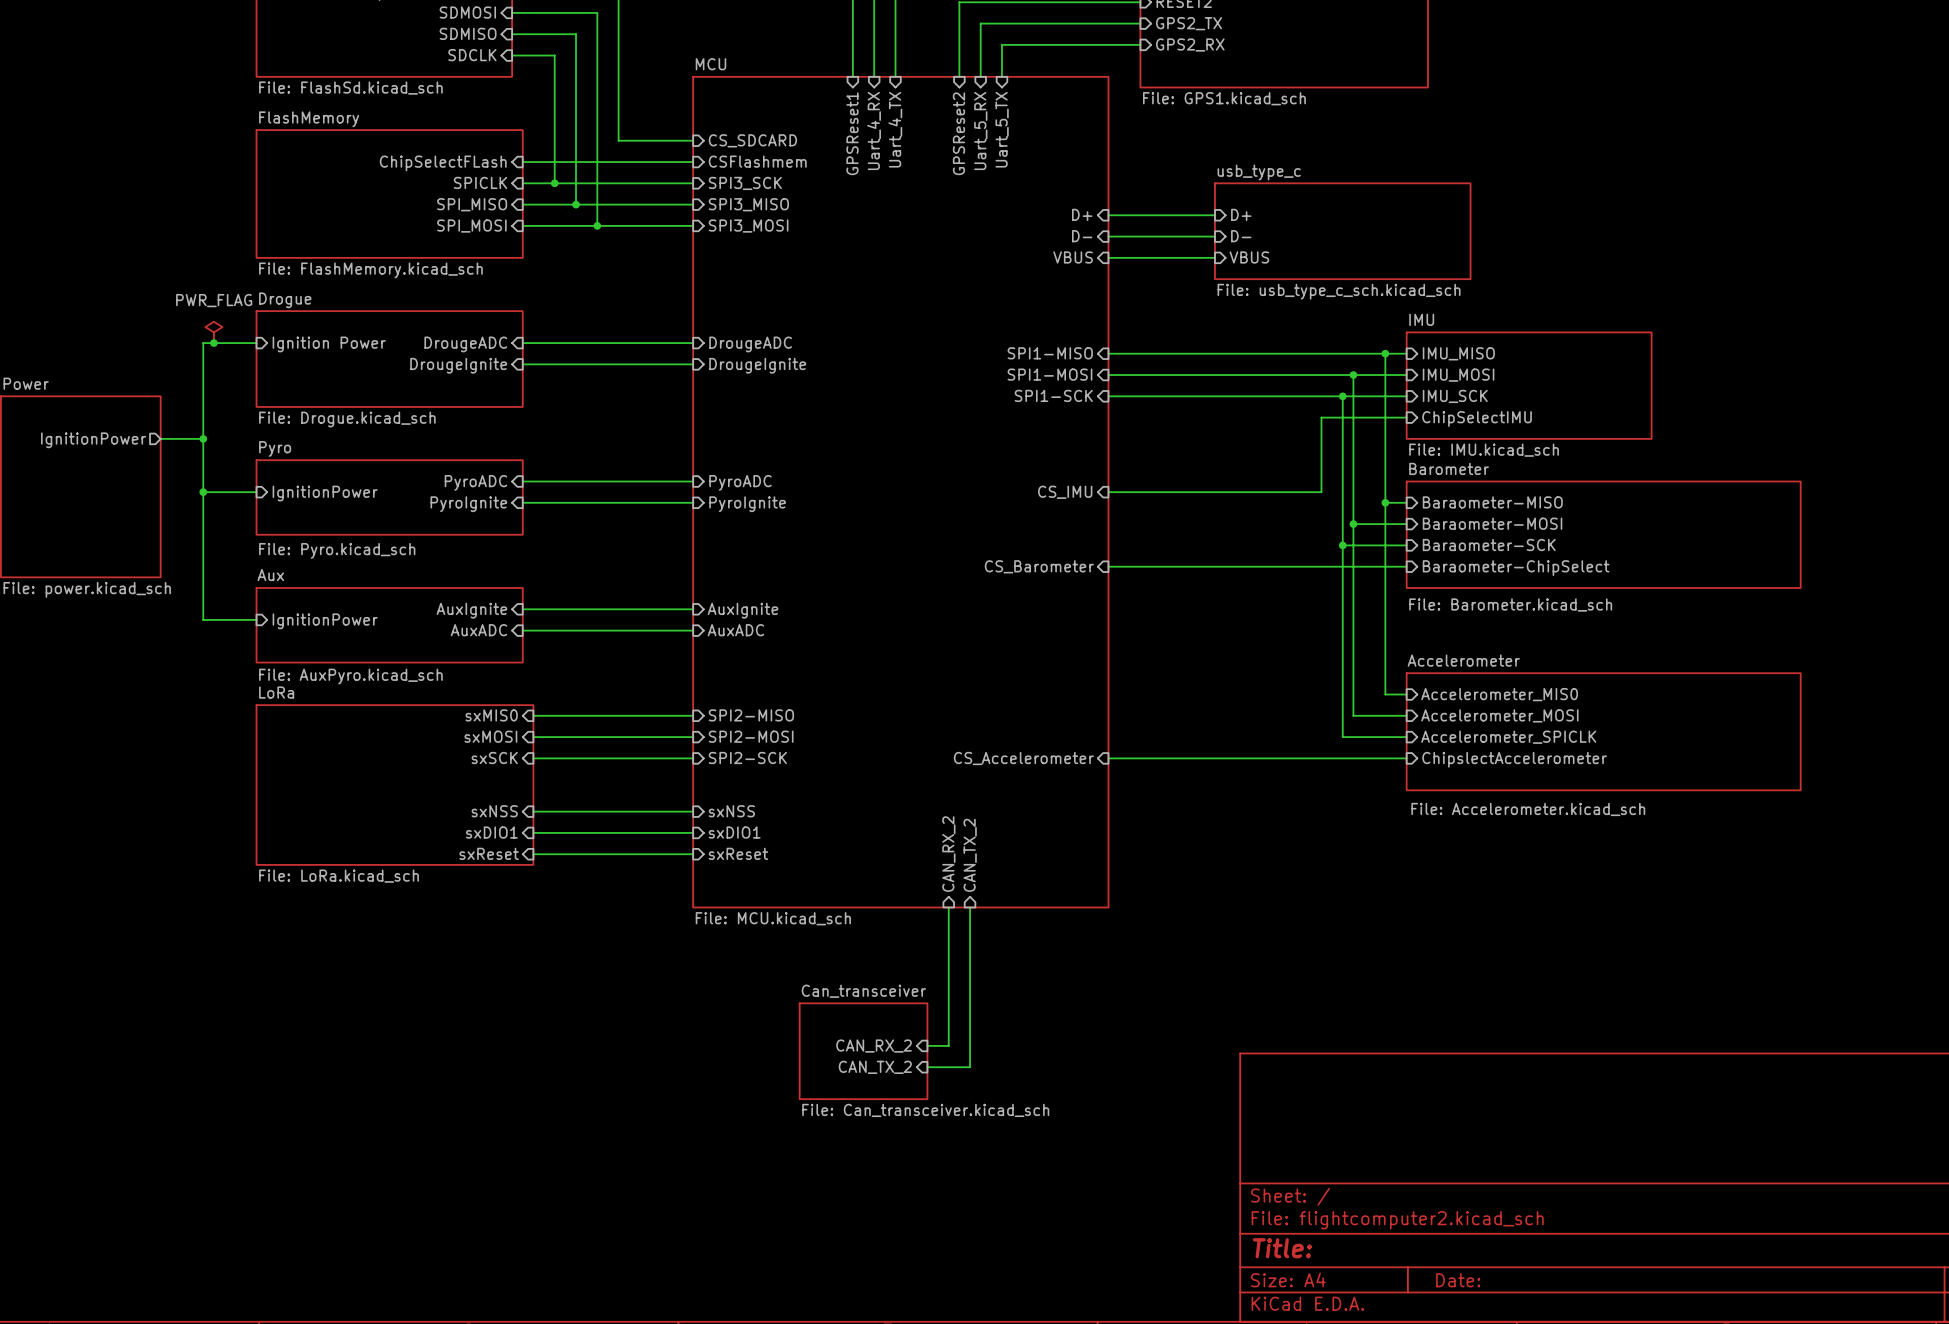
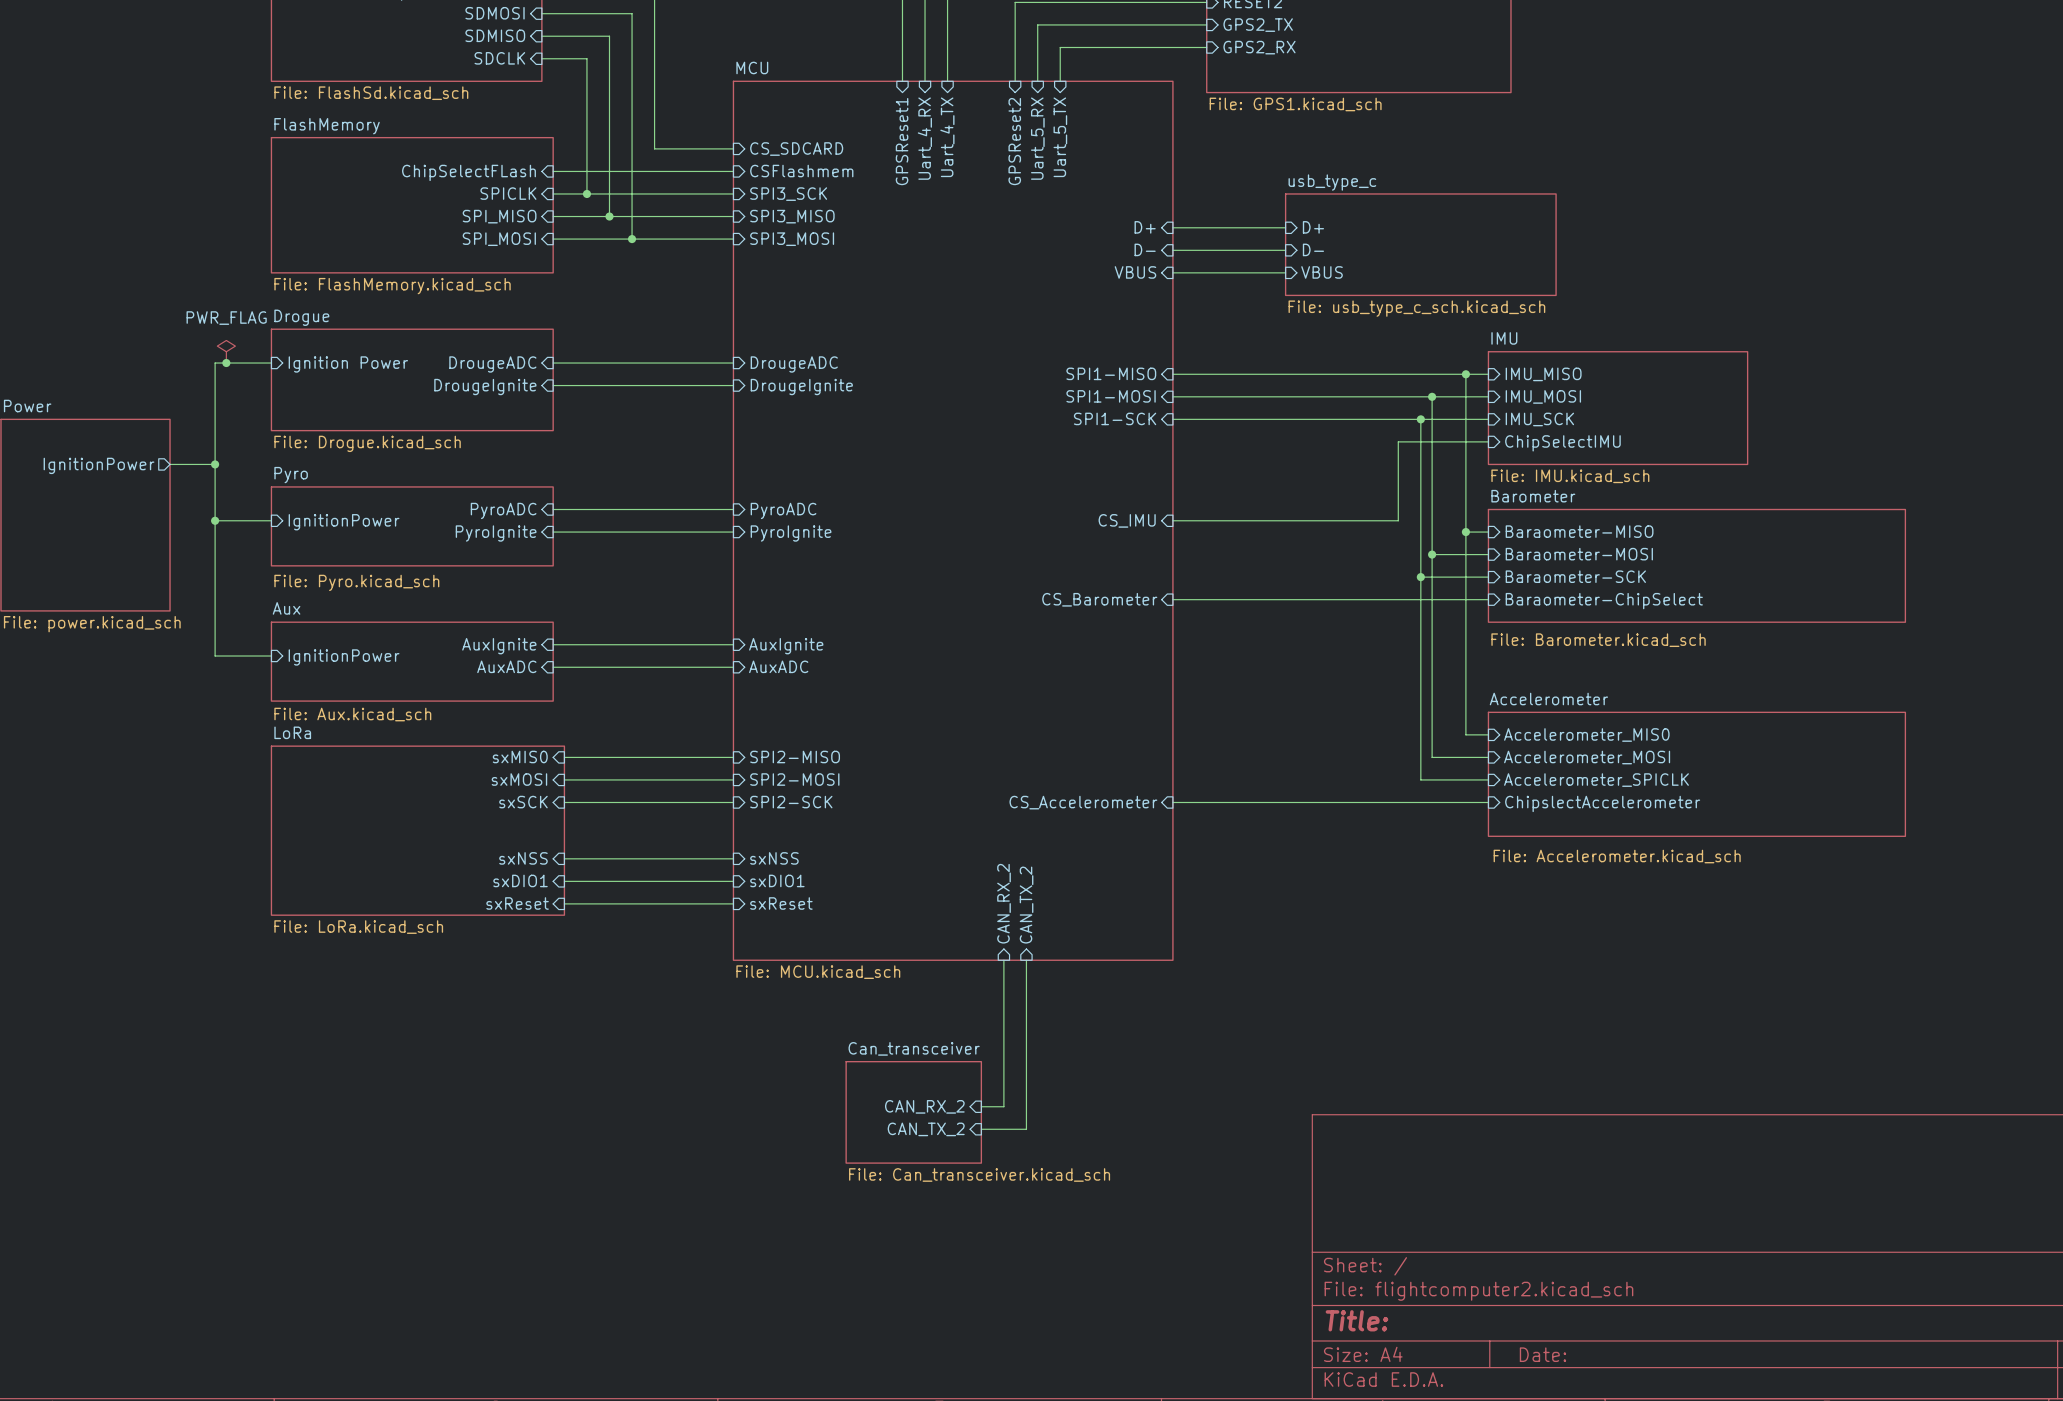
sheet Aux value: File: AuxPyro.kicad_sch (350, 676) -> File: Aux.kicad_sch (352, 714)

